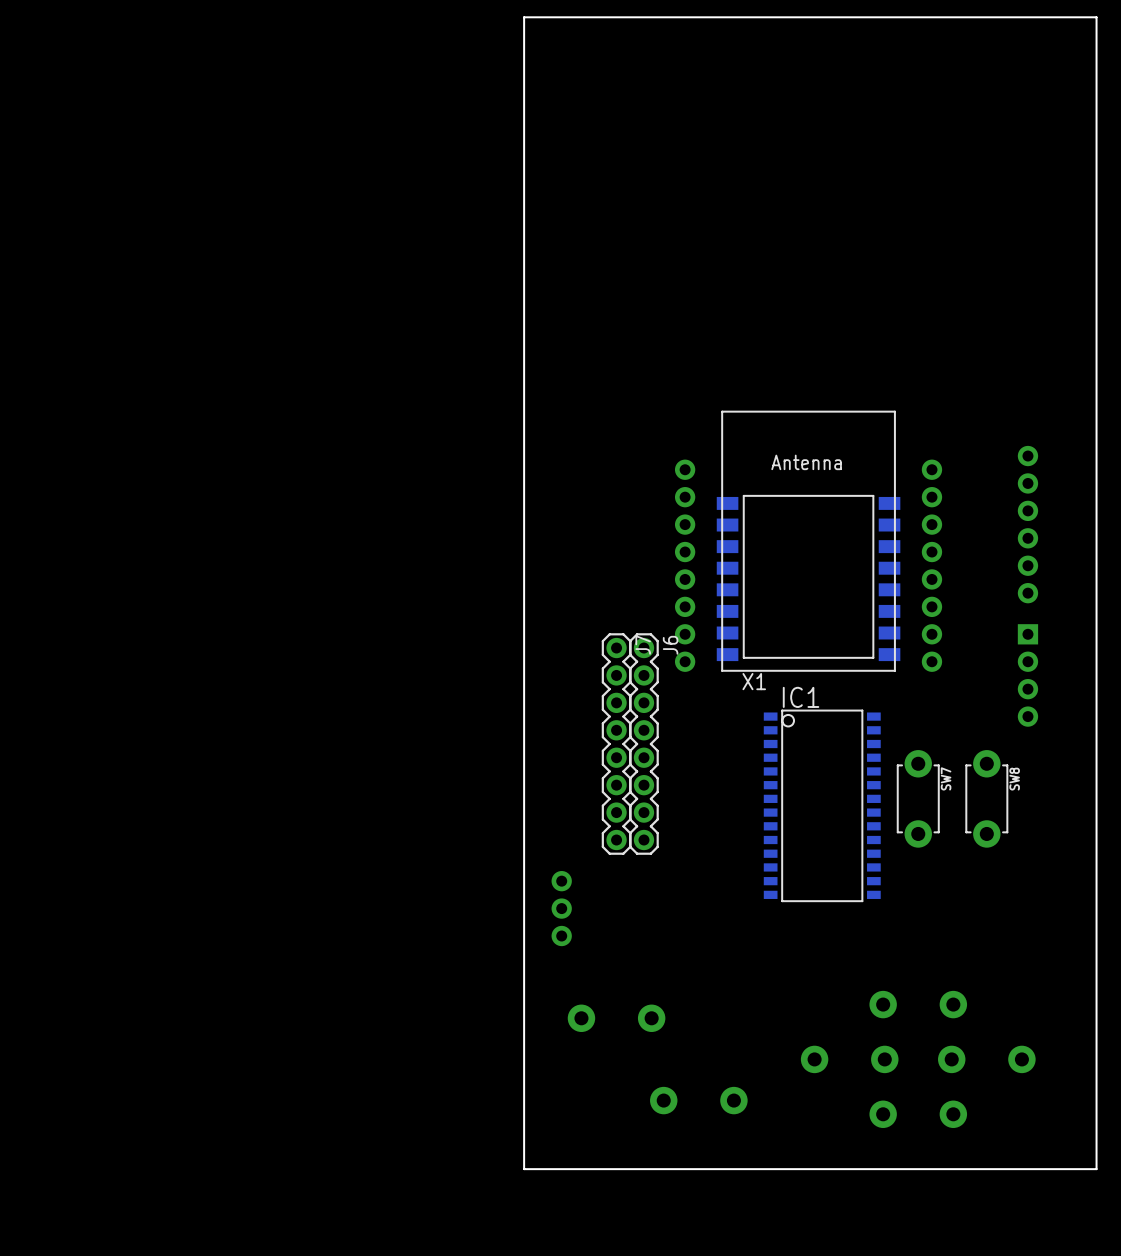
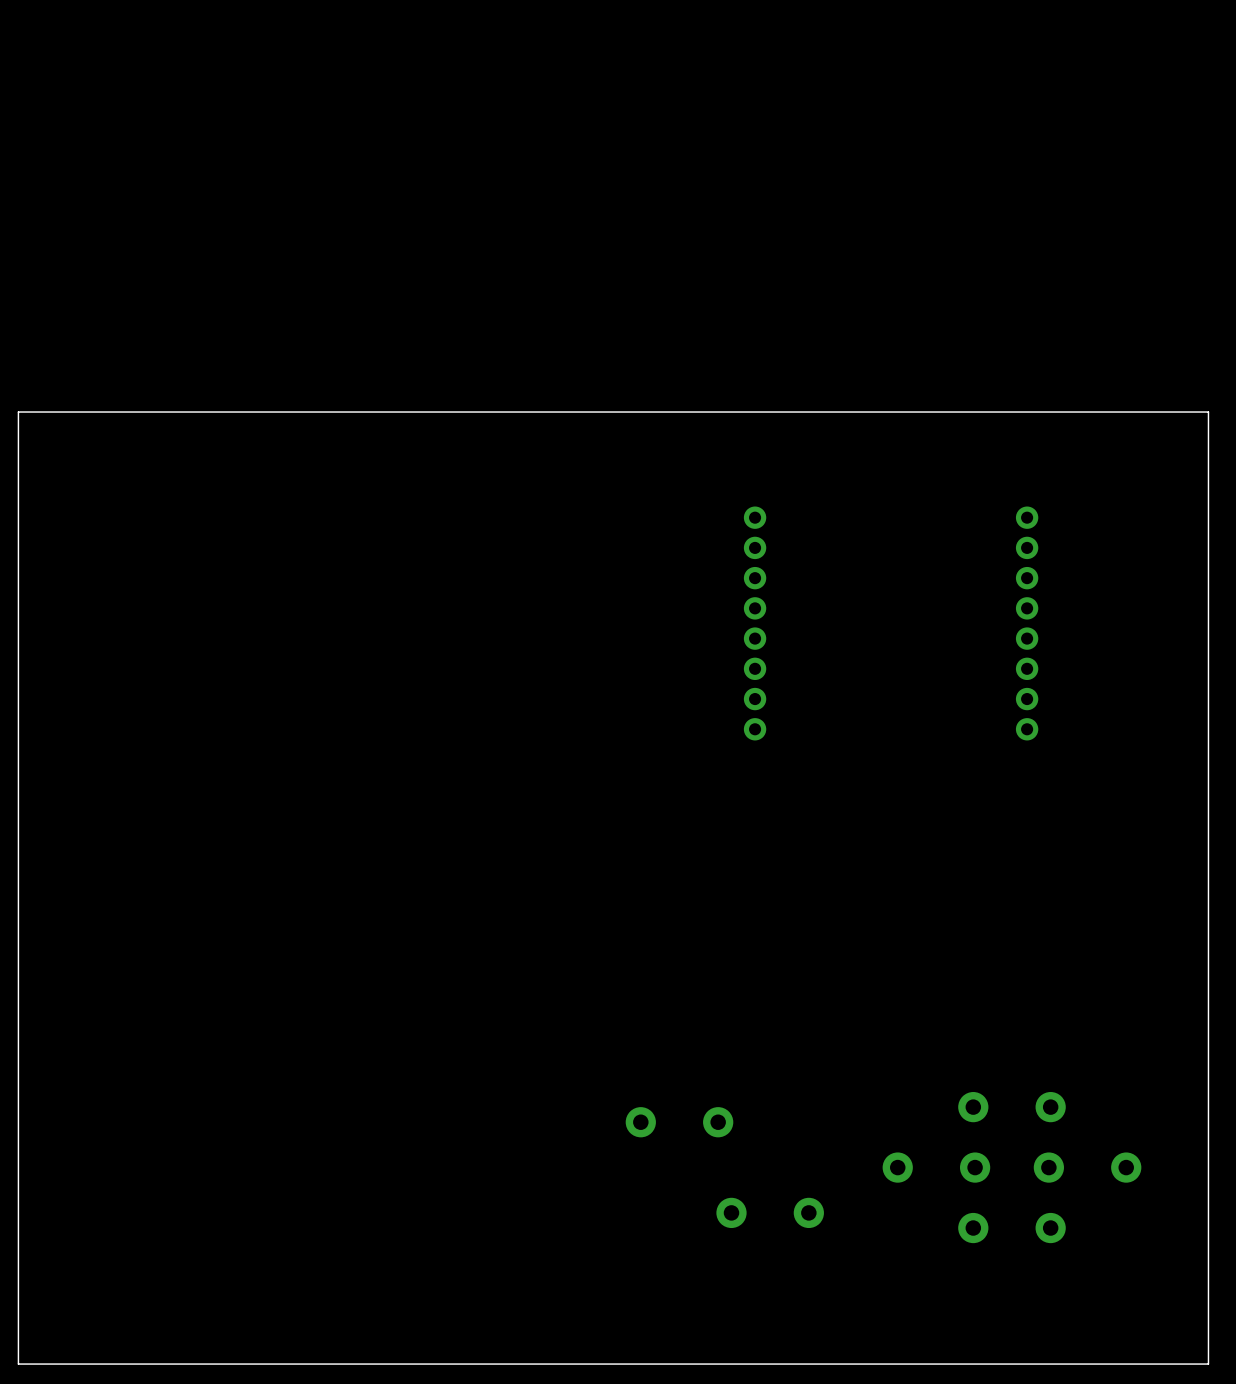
board edge: (1096, 373) (1096, 17) (524, 17) (524, 1169) (1096, 1169) -> (1208, 412) (18, 412) (18, 1364) (1208, 1364) (1208, 1288)
part: (1027, 524) -> none
X1: (808, 541) -> none
part: (1027, 675) -> none
J7: (616, 744) -> none
J6: (643, 744) -> none
SW7: (918, 798) -> none
SW8: (986, 798) -> none
IC1: (822, 805) -> none
part: (561, 908) -> none

